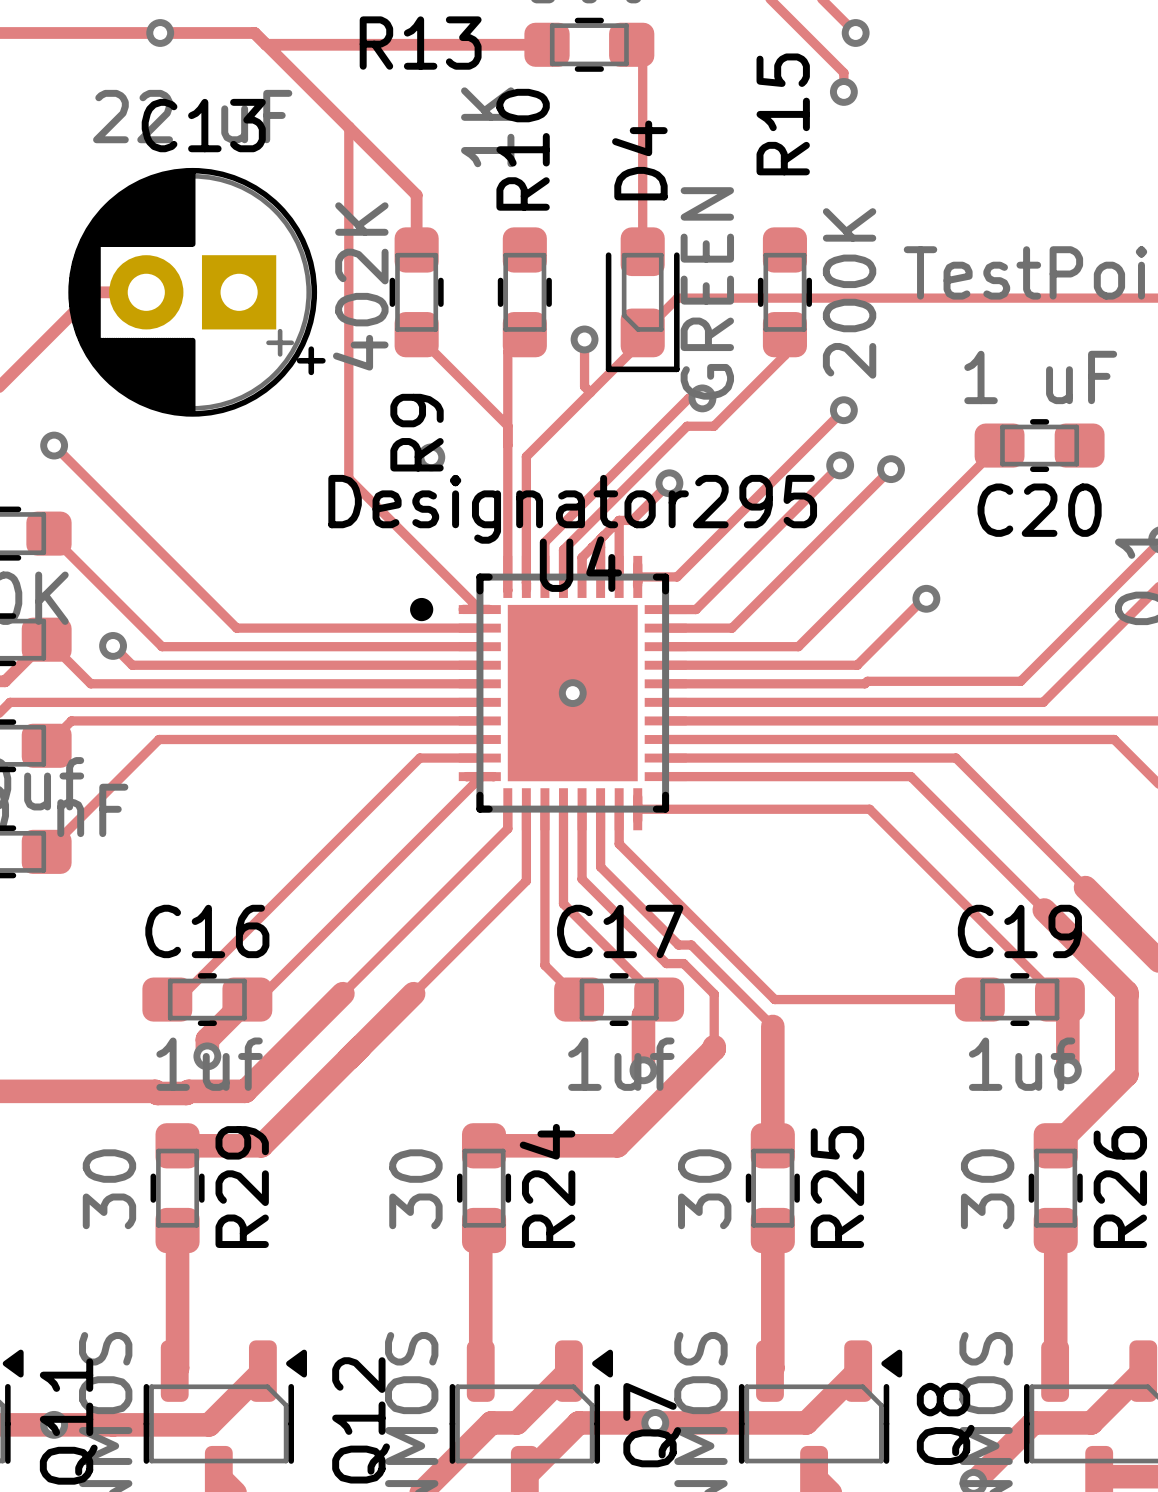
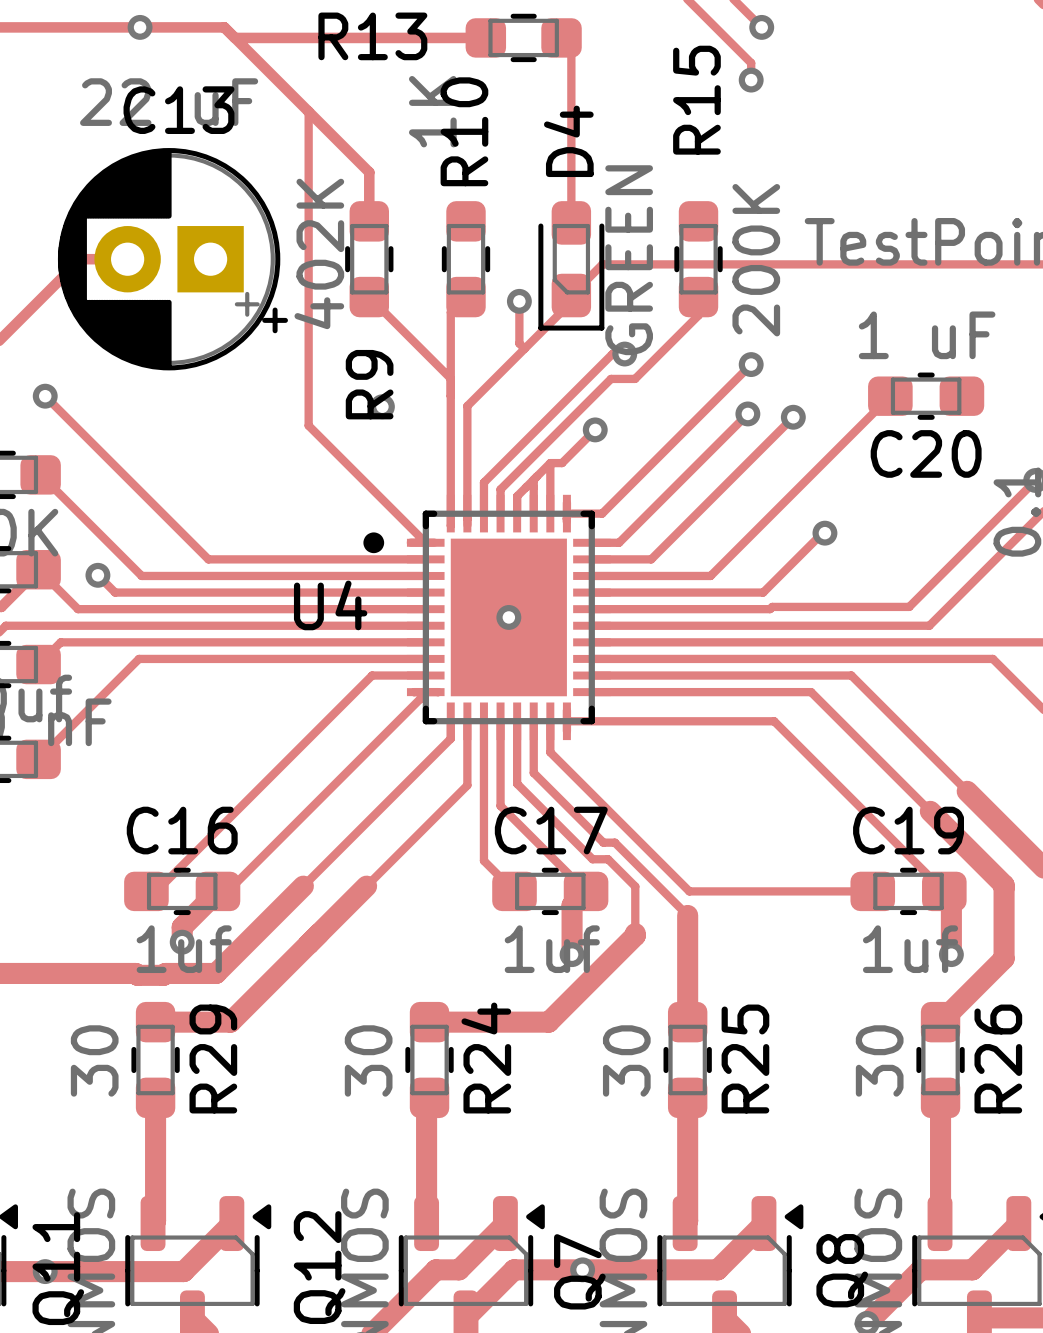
U4 text: Designator295 (572, 509) -> none
U4 name position: U4 (580, 564) -> U4 (330, 605)

